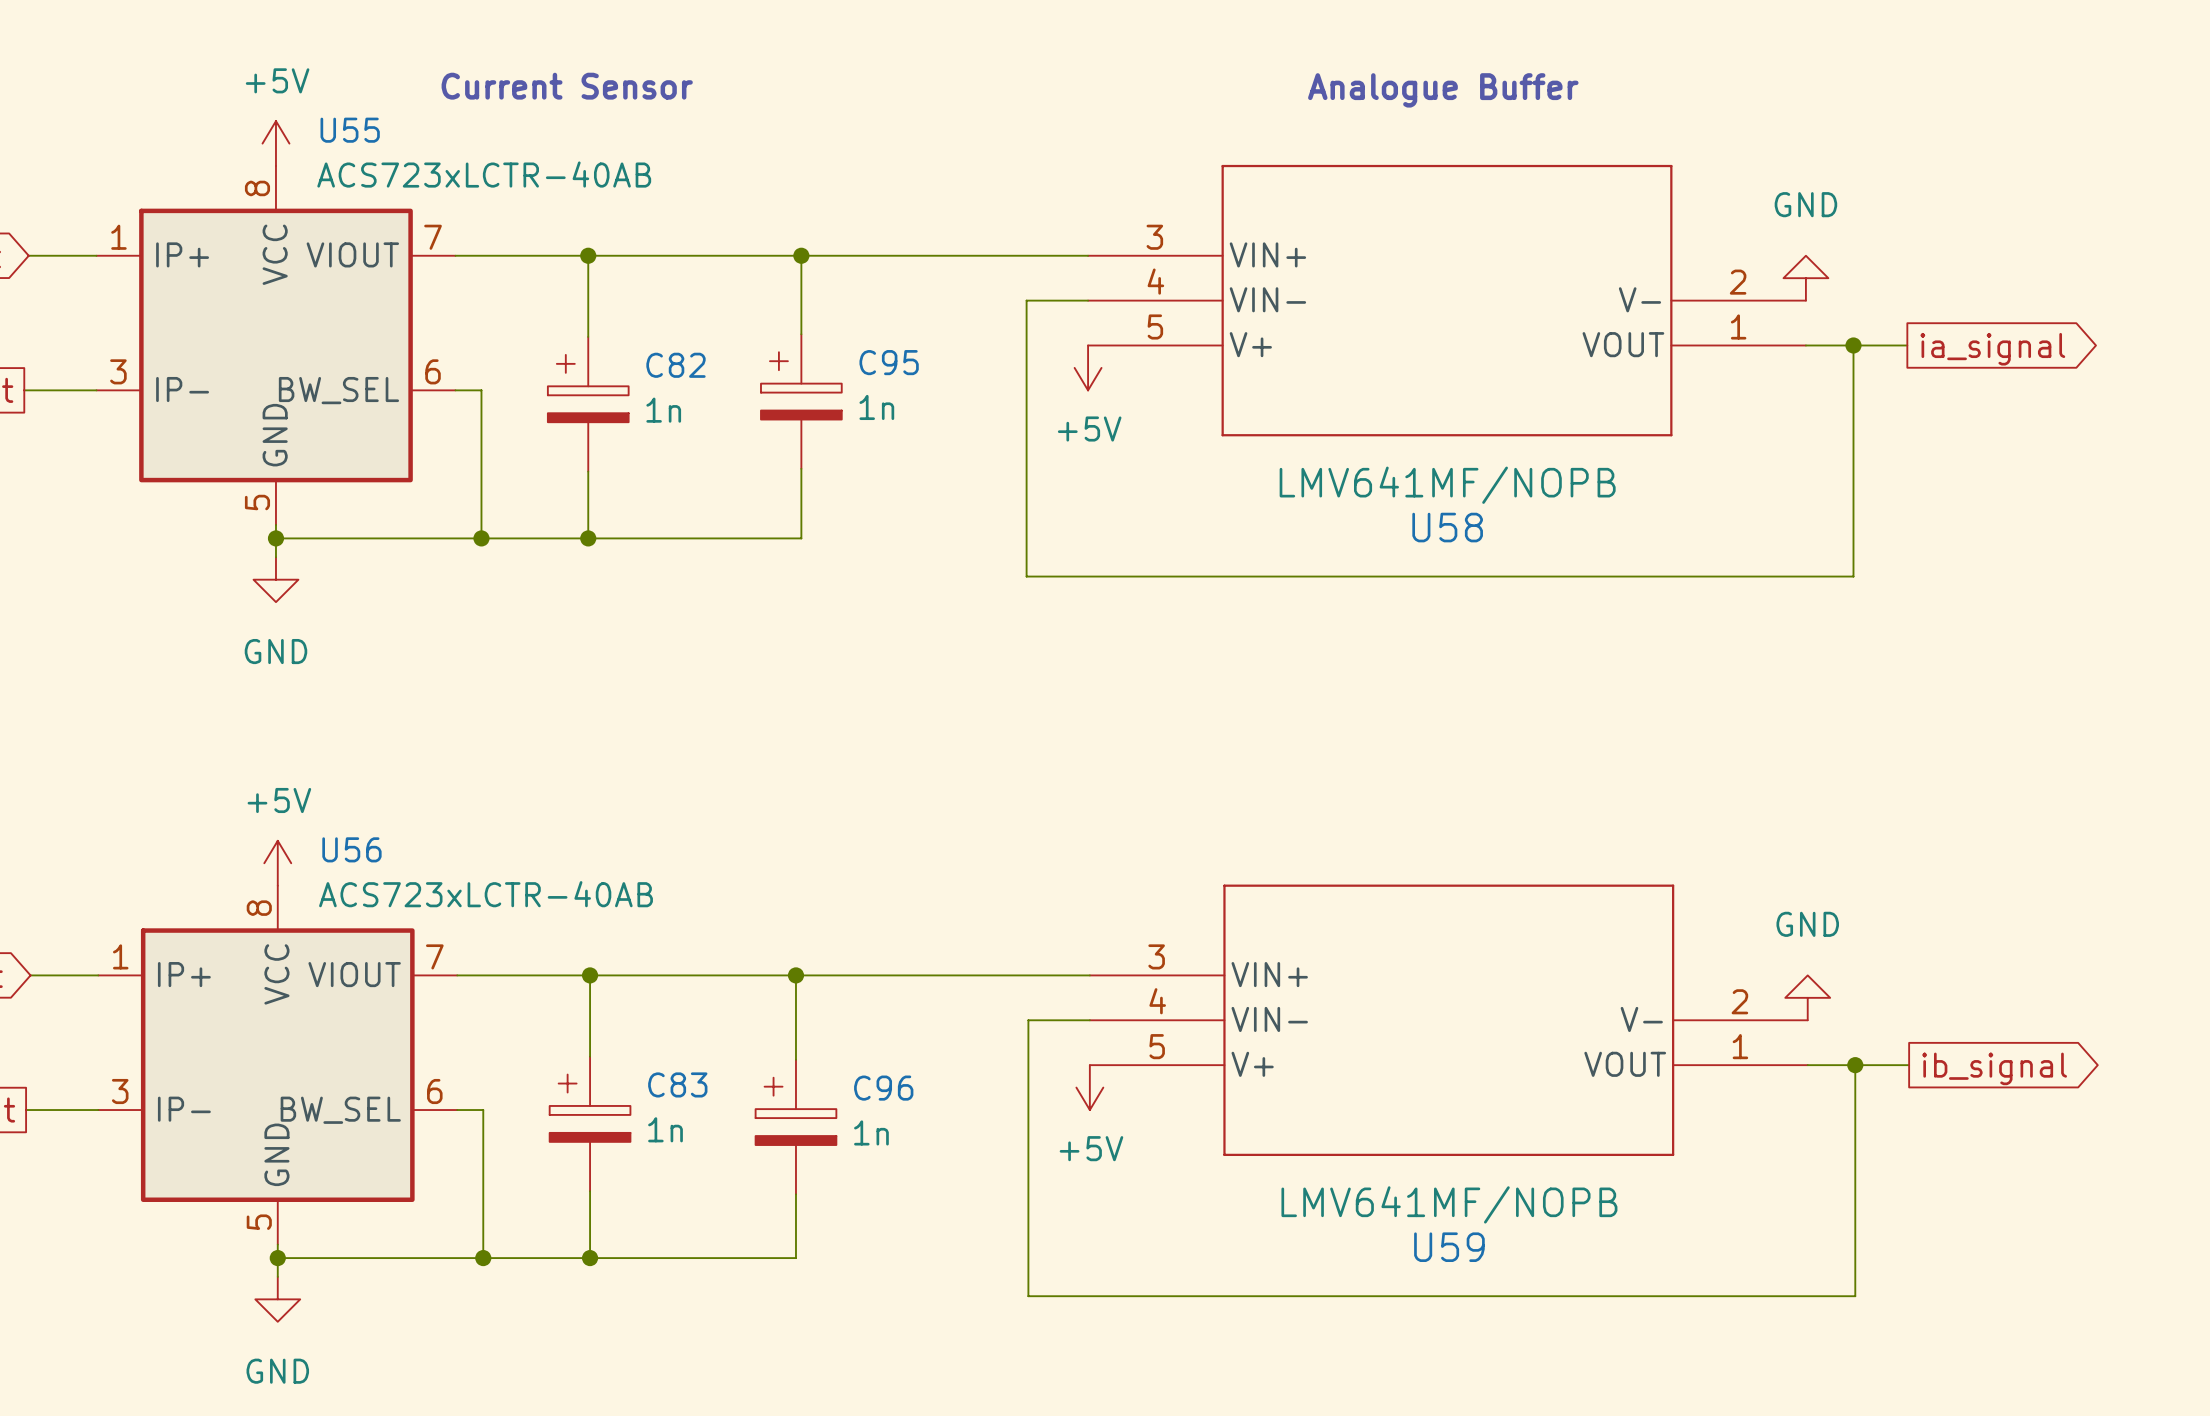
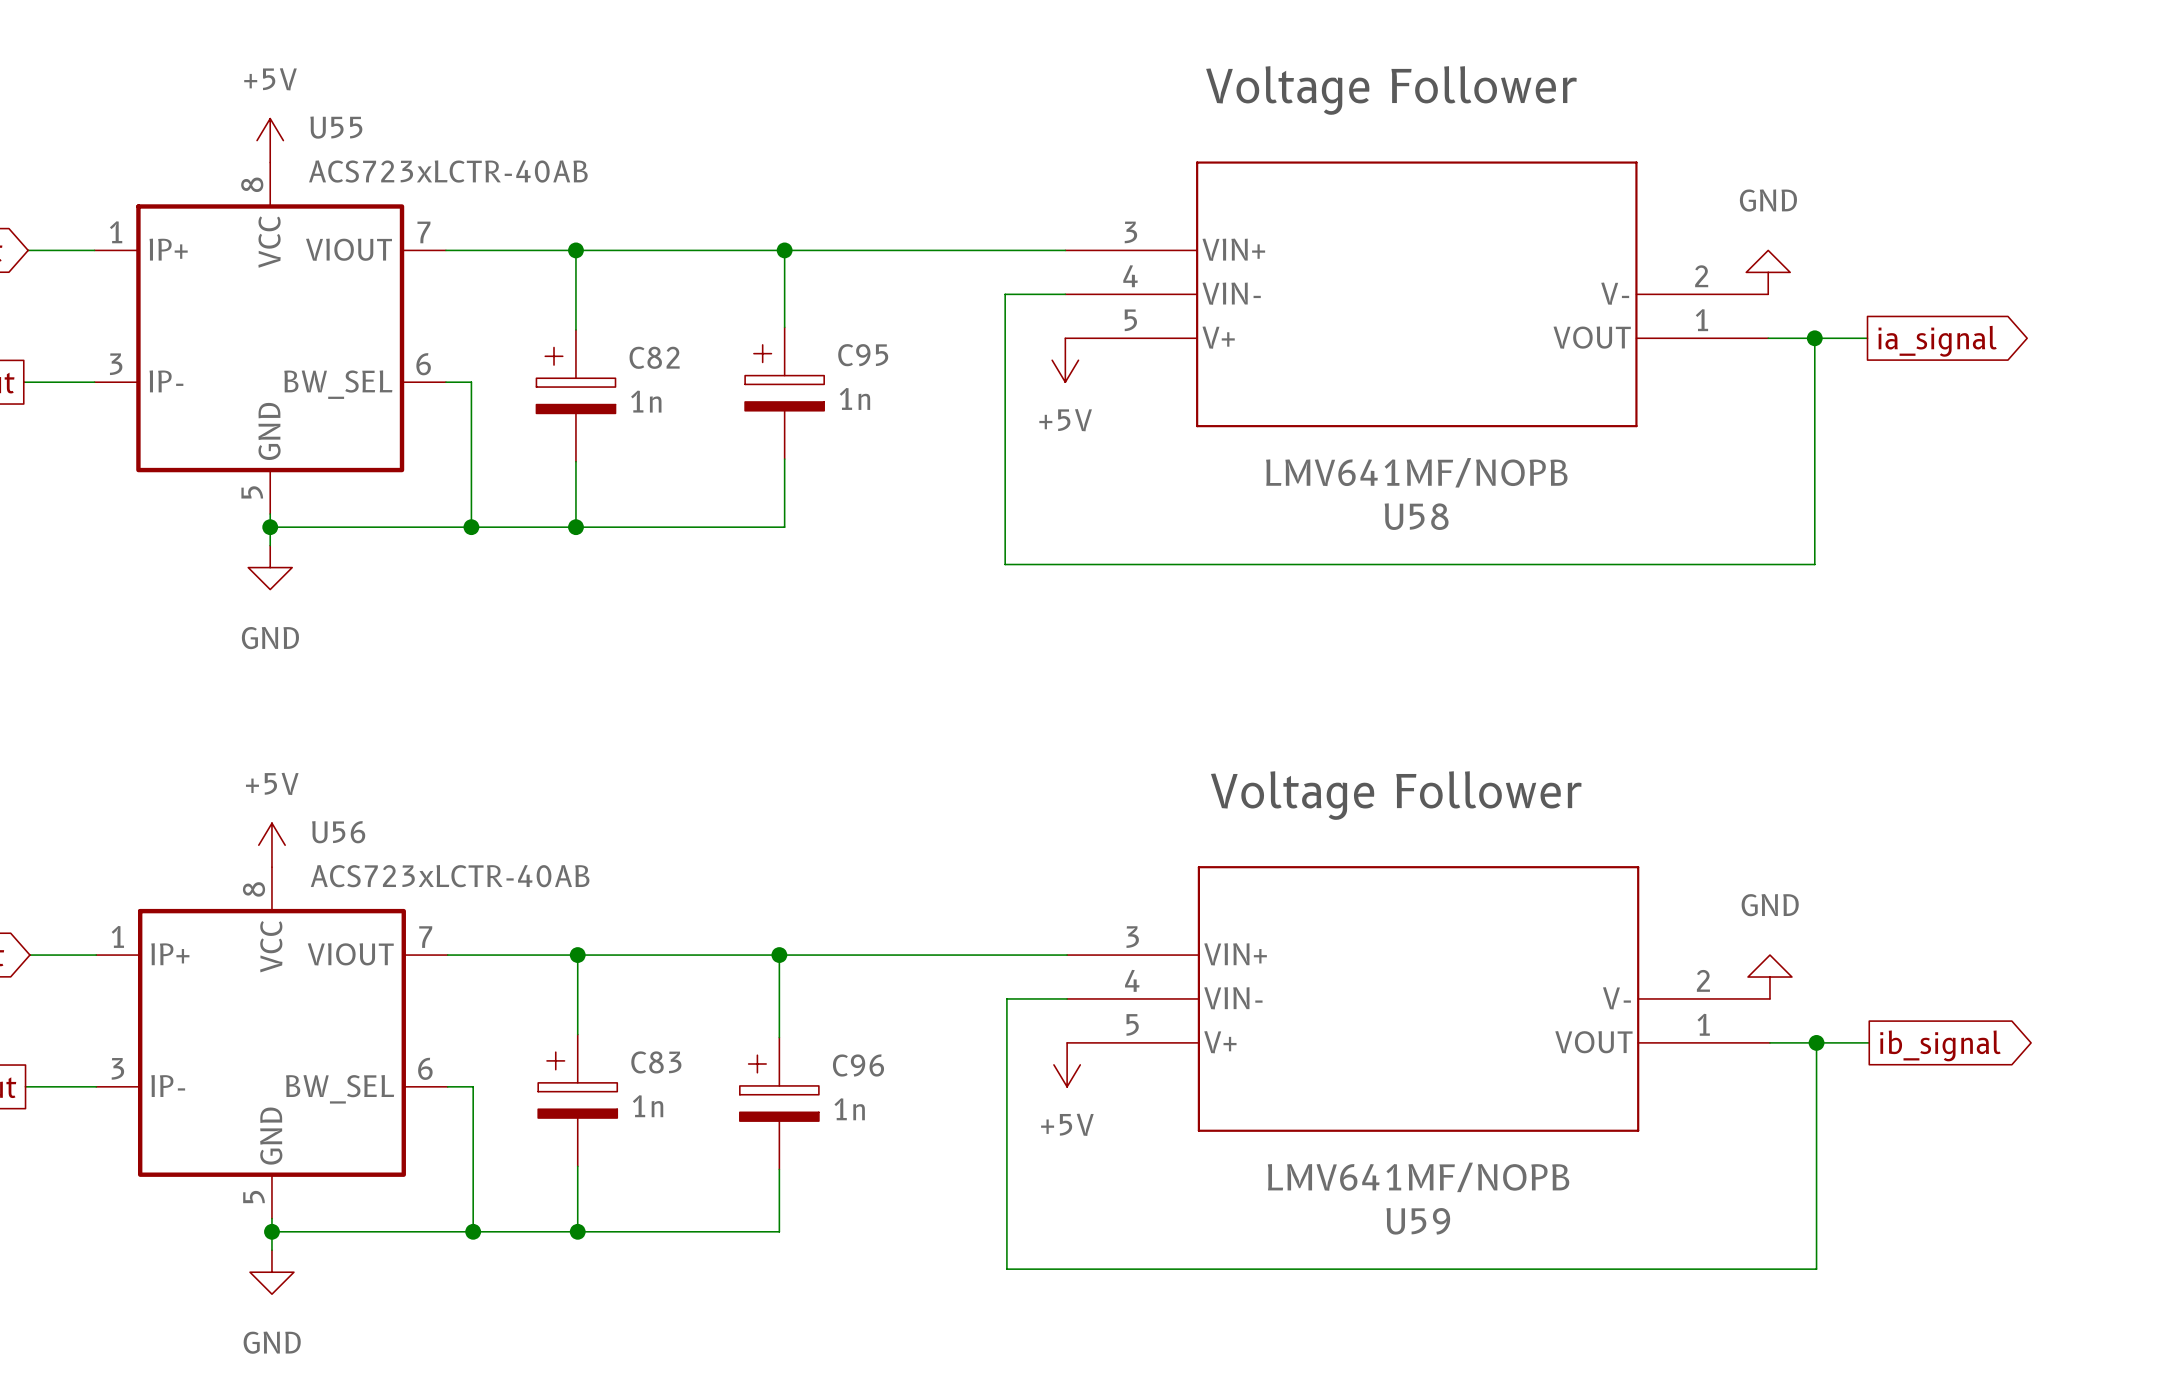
text: Current Sensor (567, 86) -> none
text: Analogue Buffer (1443, 90) -> none
text: none -> Voltage Follower (1391, 90)
text: none -> Voltage Follower (1396, 795)

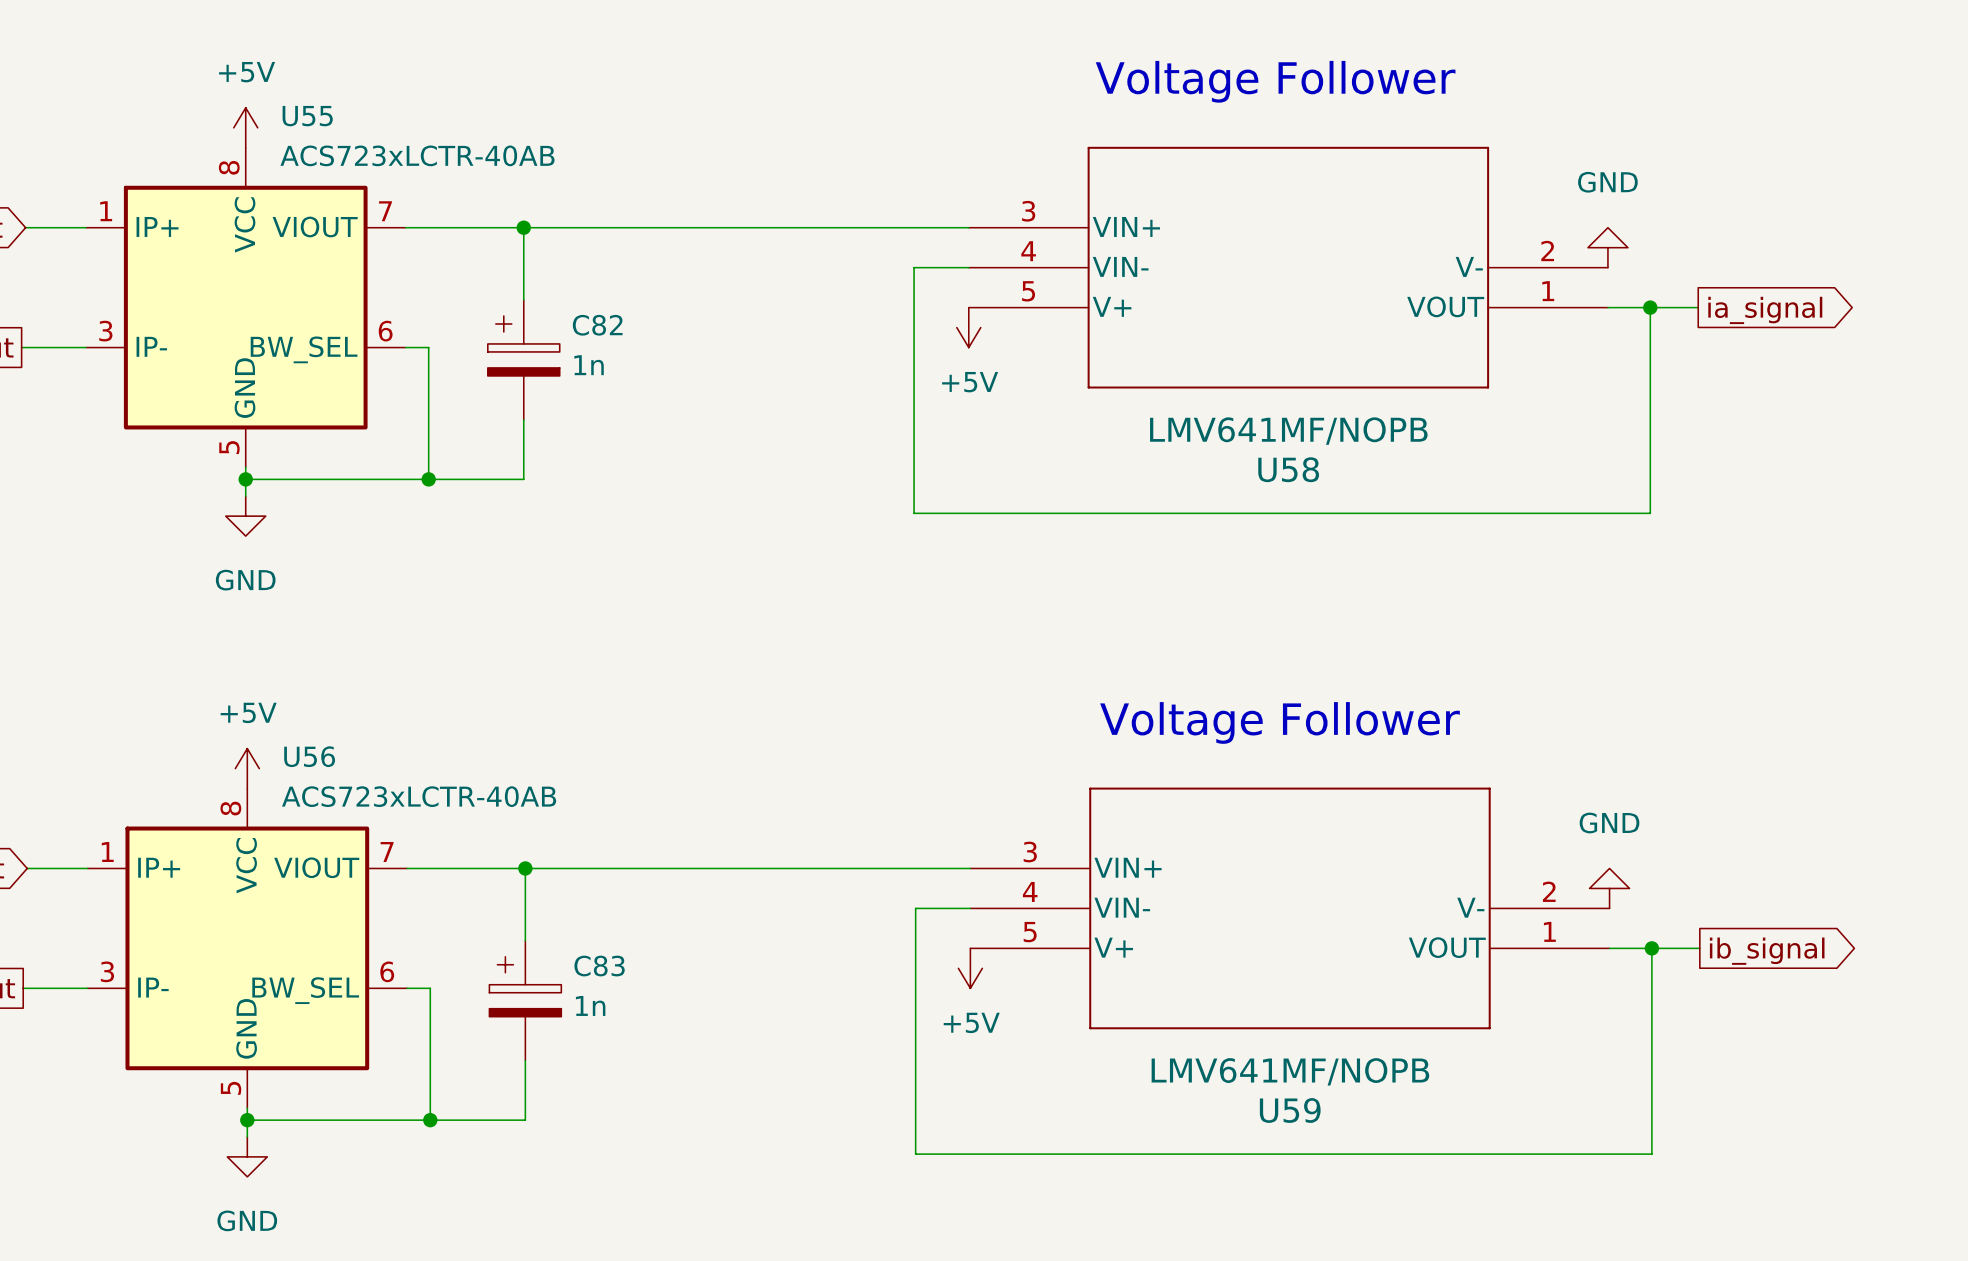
wire: (784, 250) (784, 327) -> none
junction: (784, 250) -> none
C95: 1n (784, 393) -> none
wire: (784, 459) (784, 527) (575, 527) -> none
junction: (575, 527) -> none
wire: (779, 955) (779, 1037) -> none
junction: (779, 955) -> none
C96: 1n (779, 1103) -> none
wire: (779, 1169) (779, 1231) (577, 1231) -> none
junction: (577, 1231) -> none

